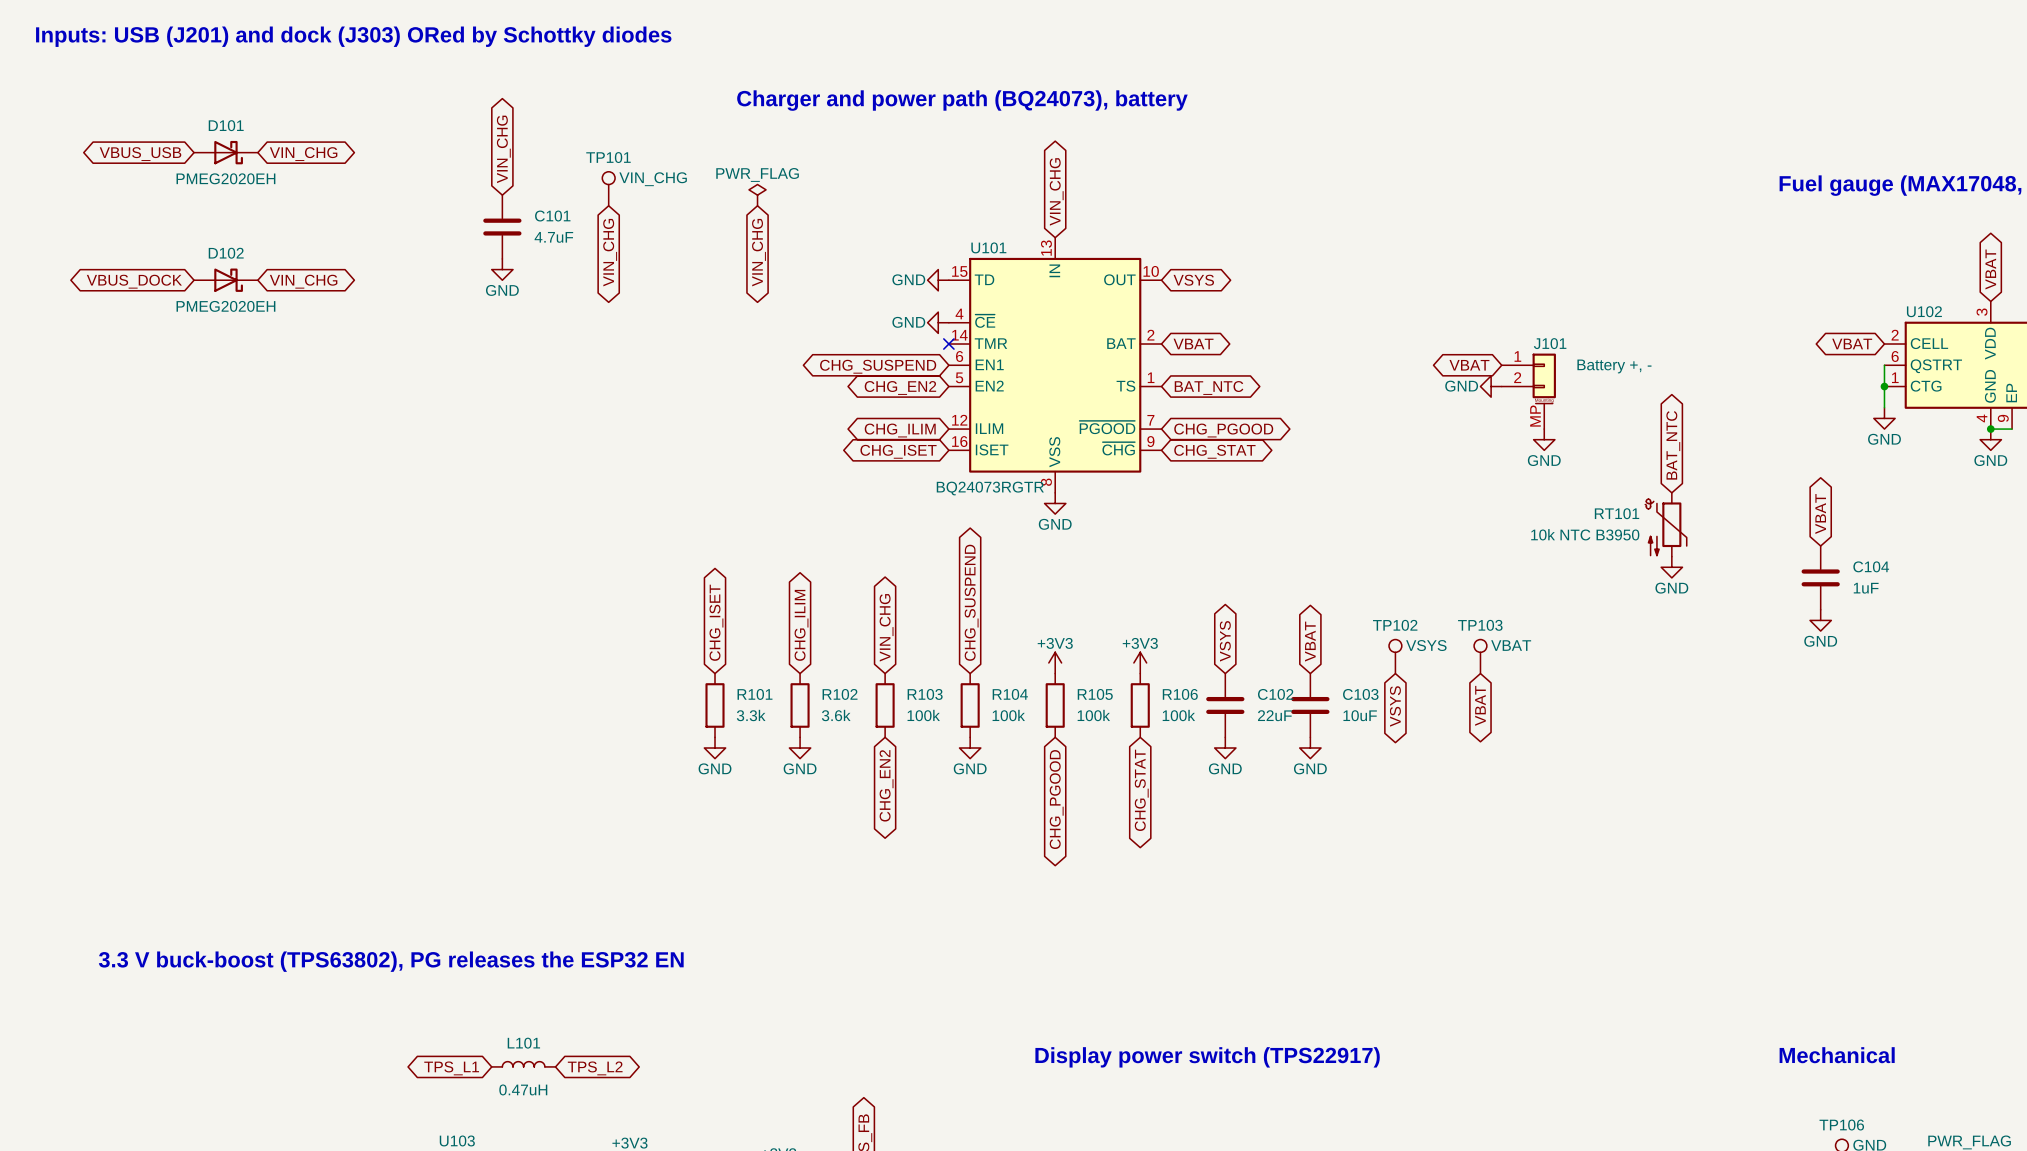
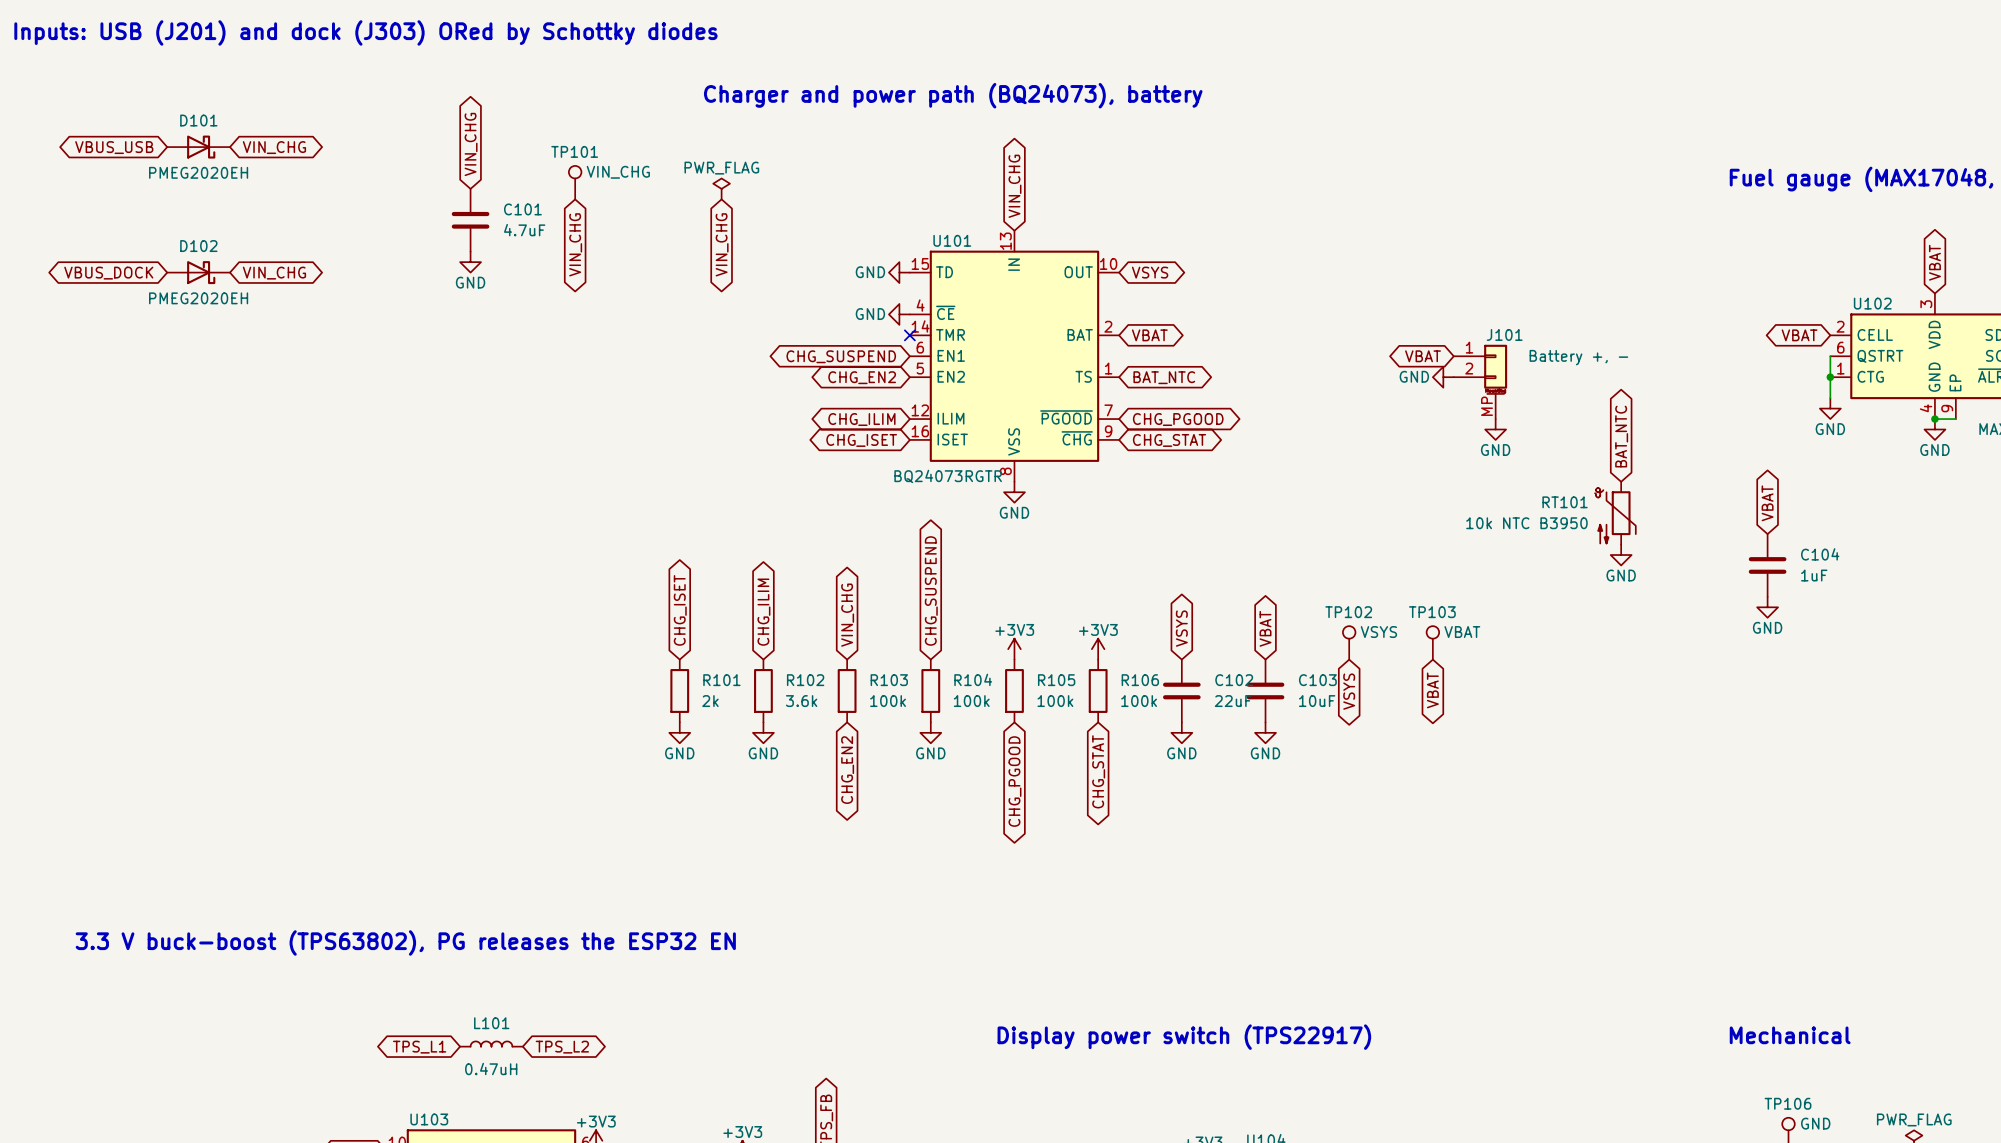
R101 value: 3.3k (751, 715) -> 2k (710, 701)

